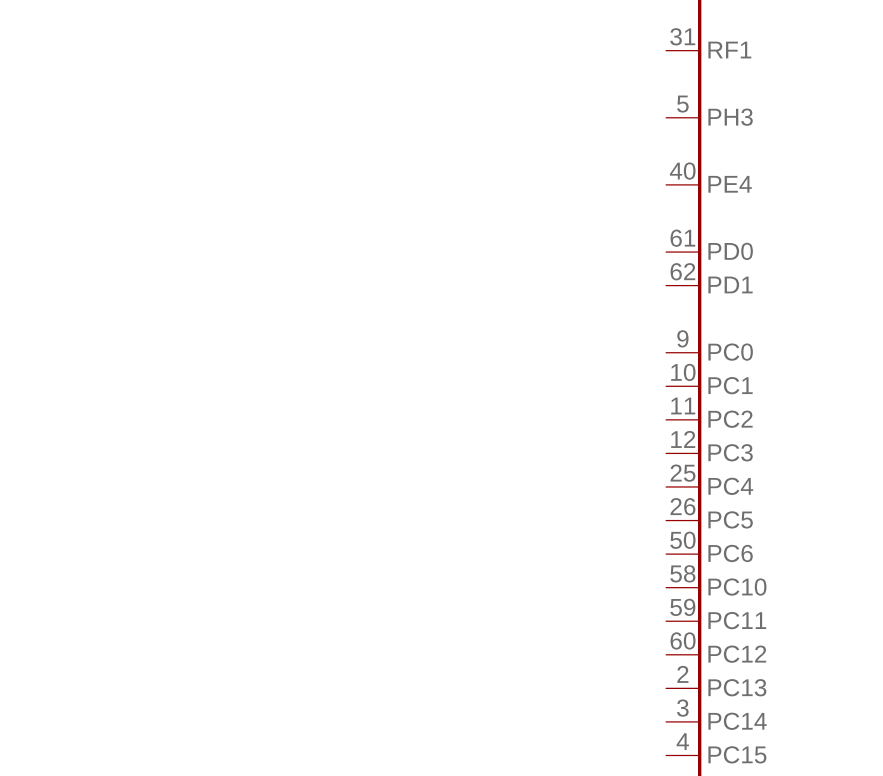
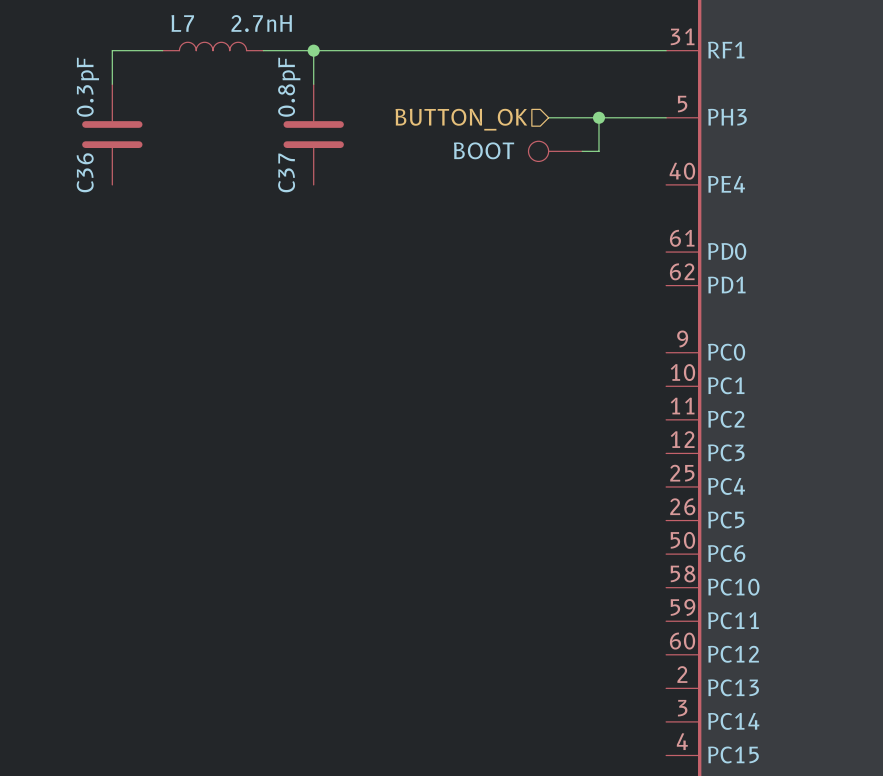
L7: none -> 2.7nH (213, 46)
wire: none -> (162, 50) (112, 50) (112, 84)
wire: none -> (263, 50) (666, 50)
wire: none -> (313, 50) (313, 84)
junction: none -> (313, 50)
wire: none -> (548, 117) (666, 117)
wire: none -> (598, 117) (598, 151) (582, 151)
junction: none -> (598, 117)
hierarchical label: none -> BUTTON_OK (461, 119)
C36: none -> 0.3pF (112, 134)
C37: none -> 0.8pF (313, 134)
part: none -> BOOT (555, 151)

